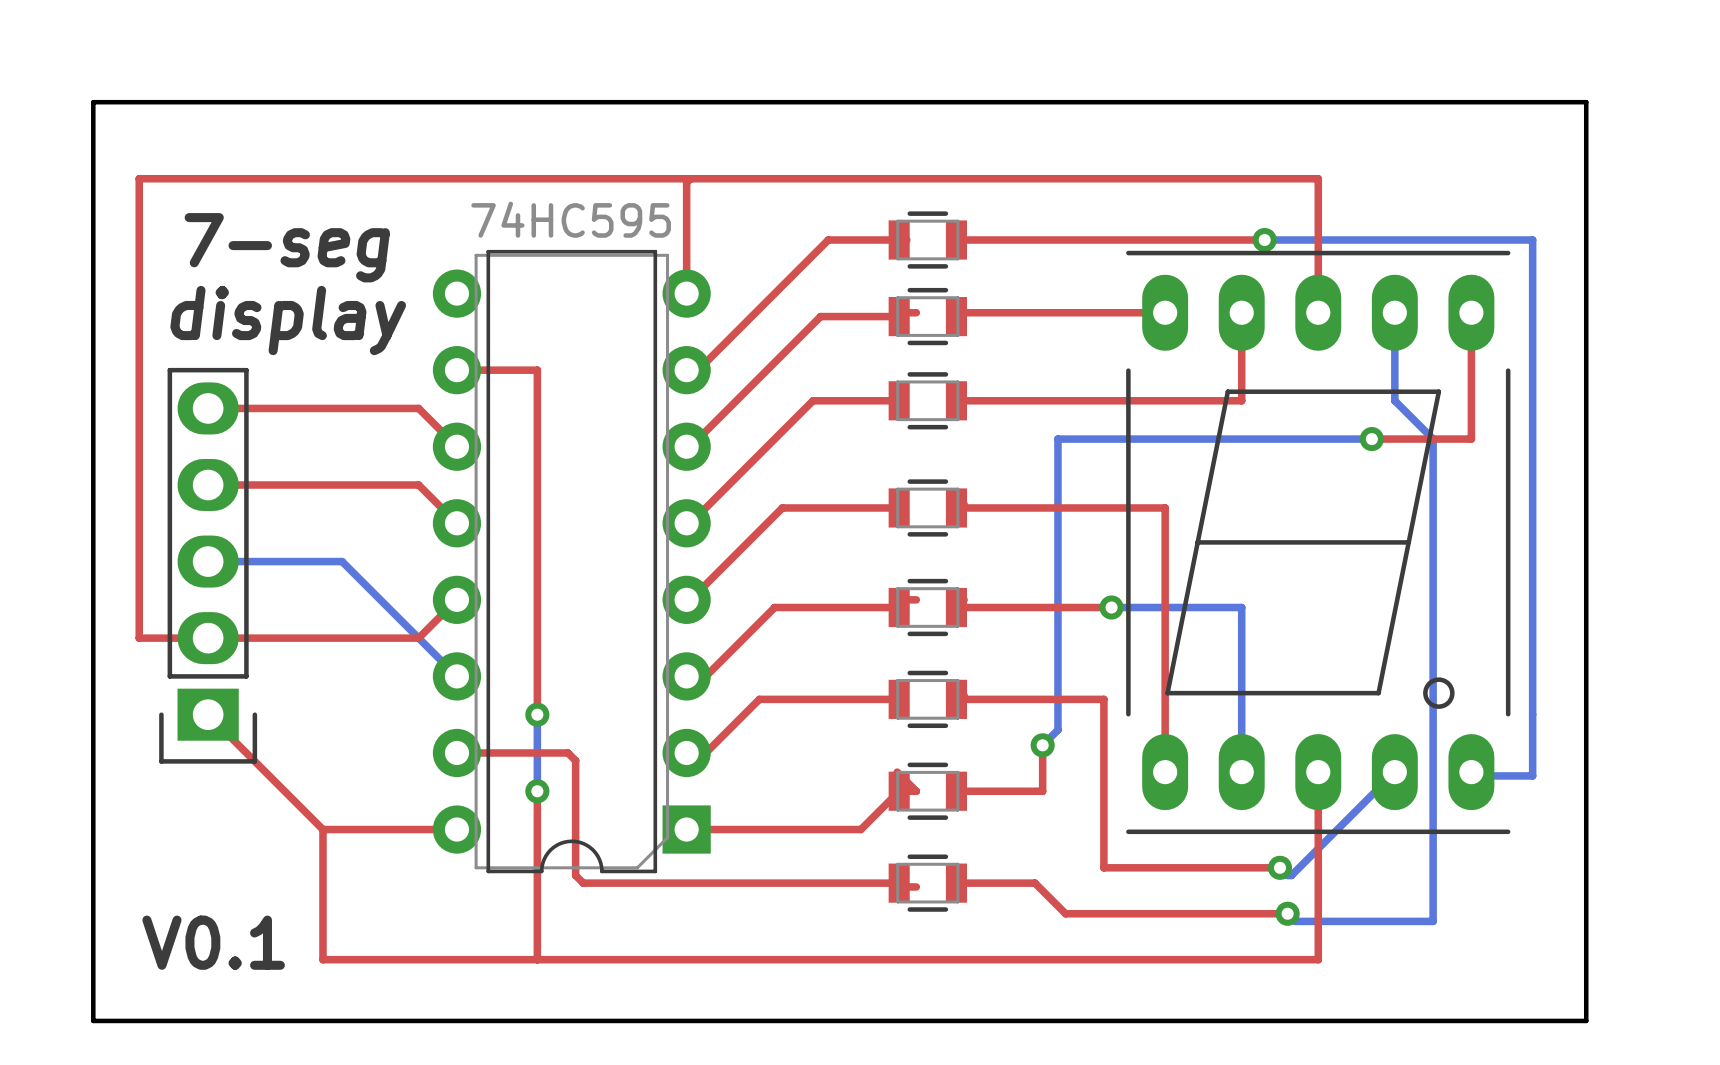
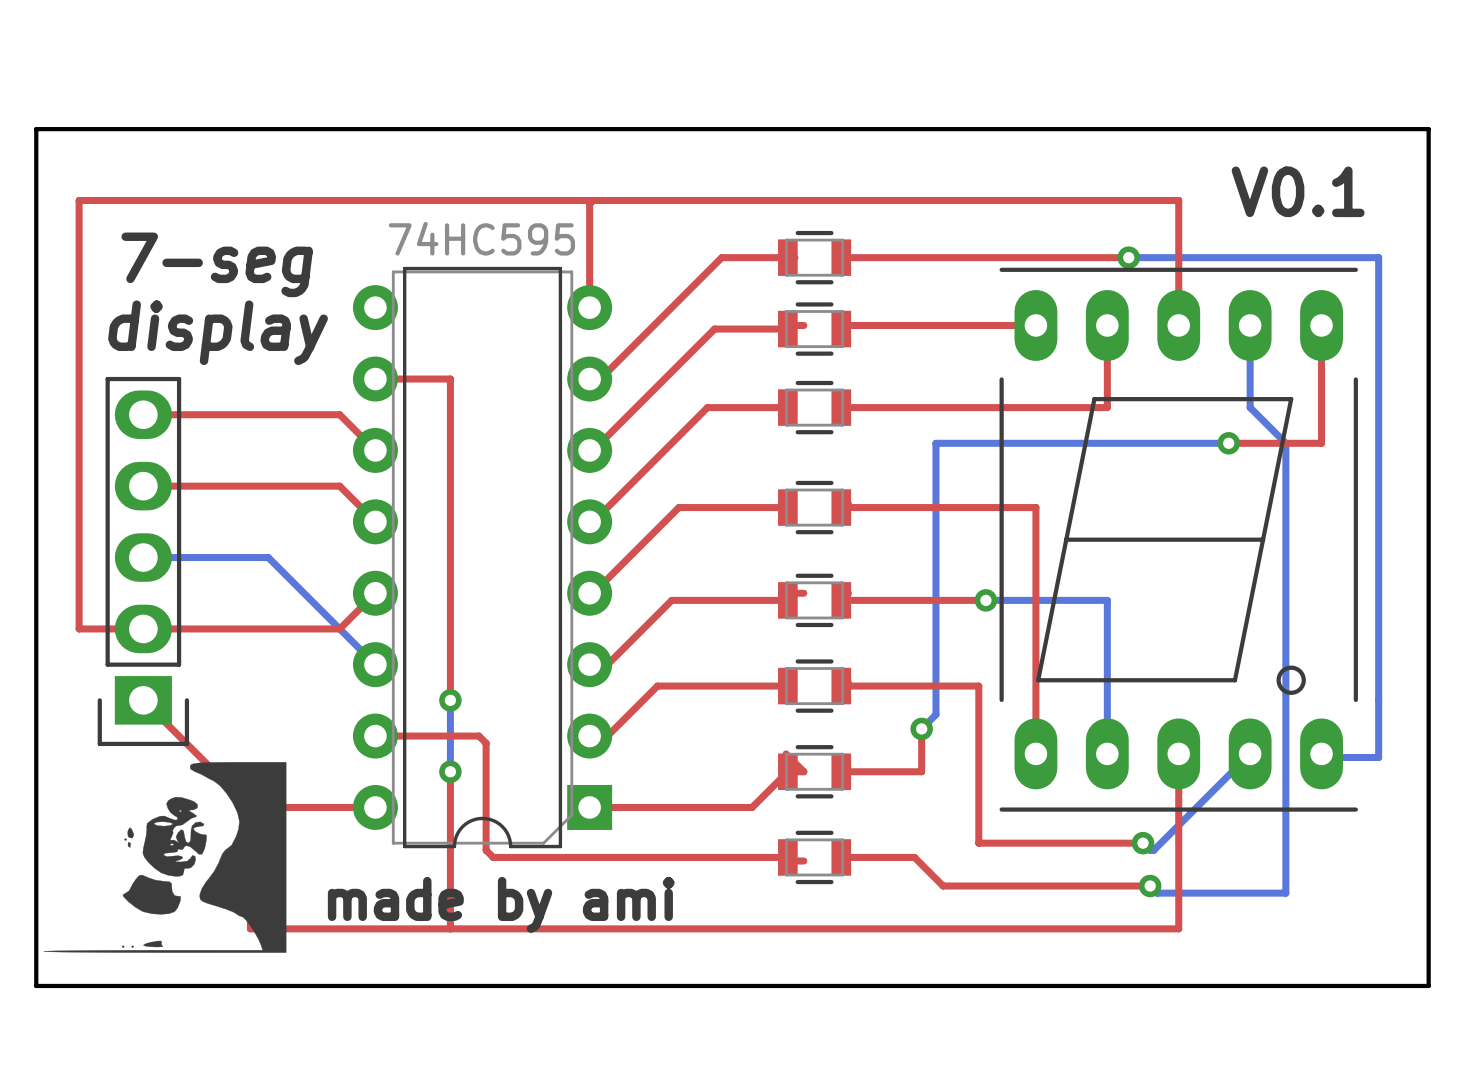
text: none -> V0.1 (1298, 191)
drawing: none -> [43, 762, 287, 953]
text: V0.1 (213, 942) -> none

